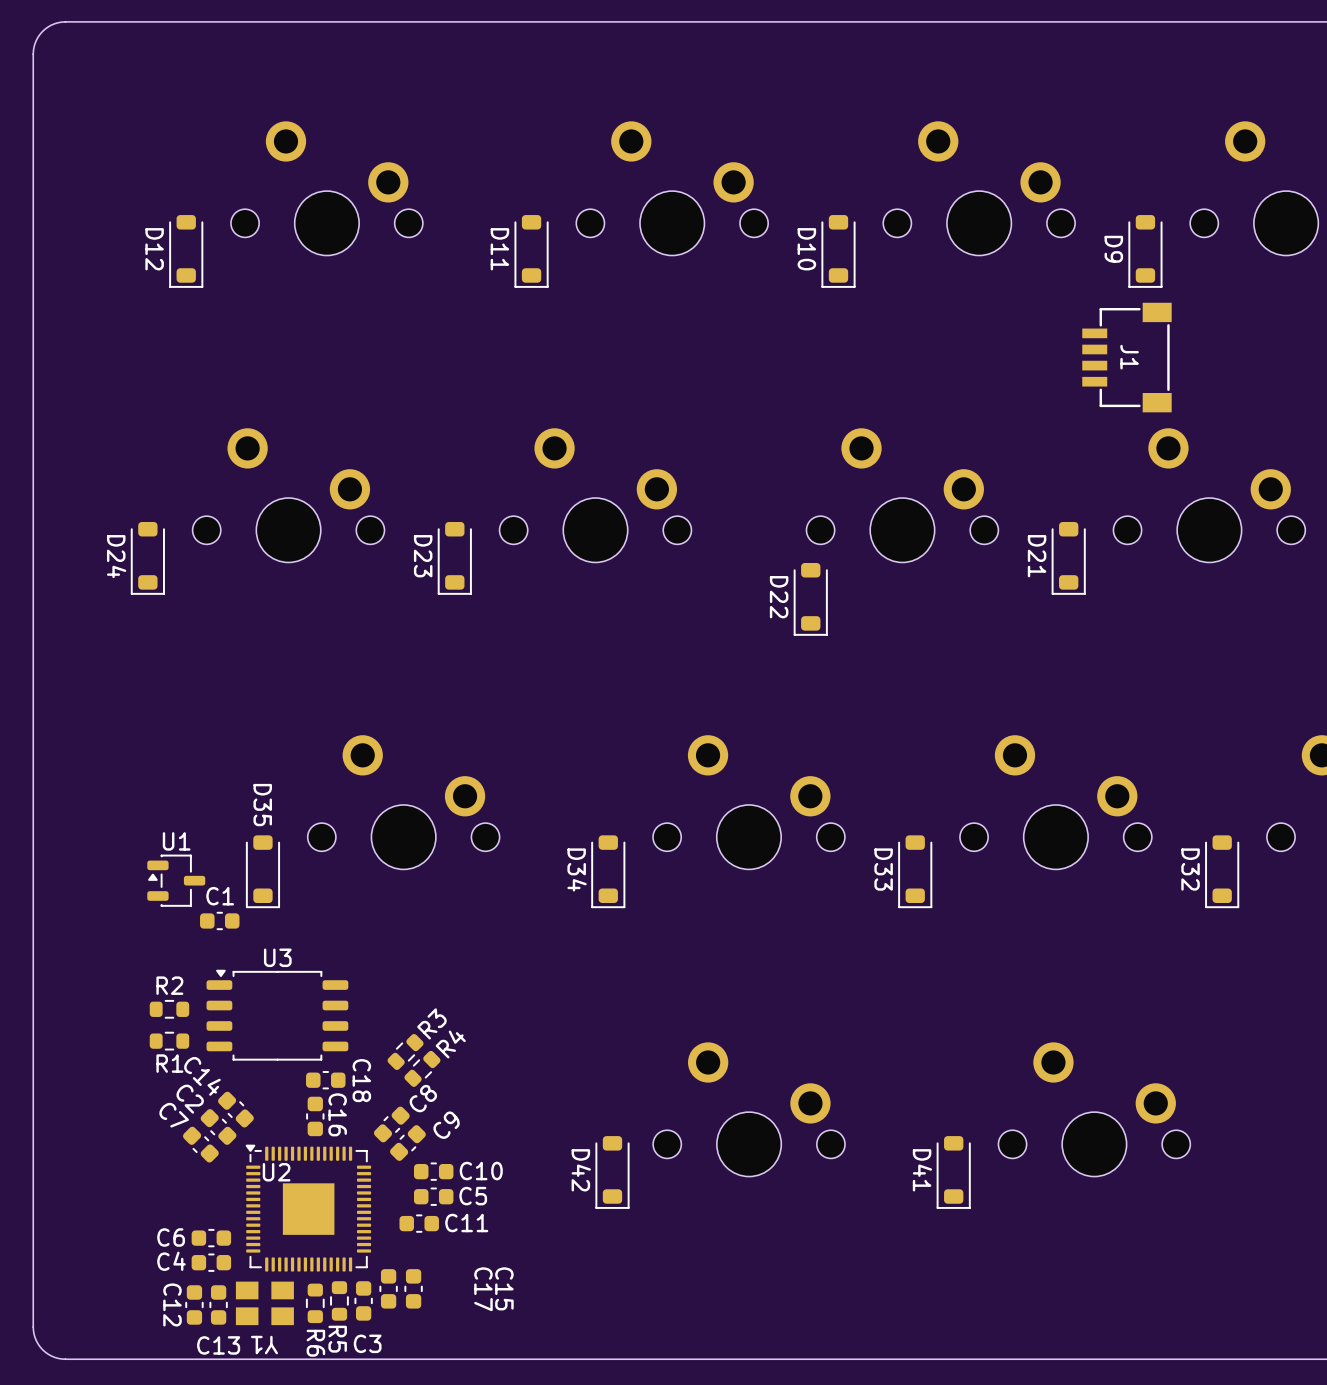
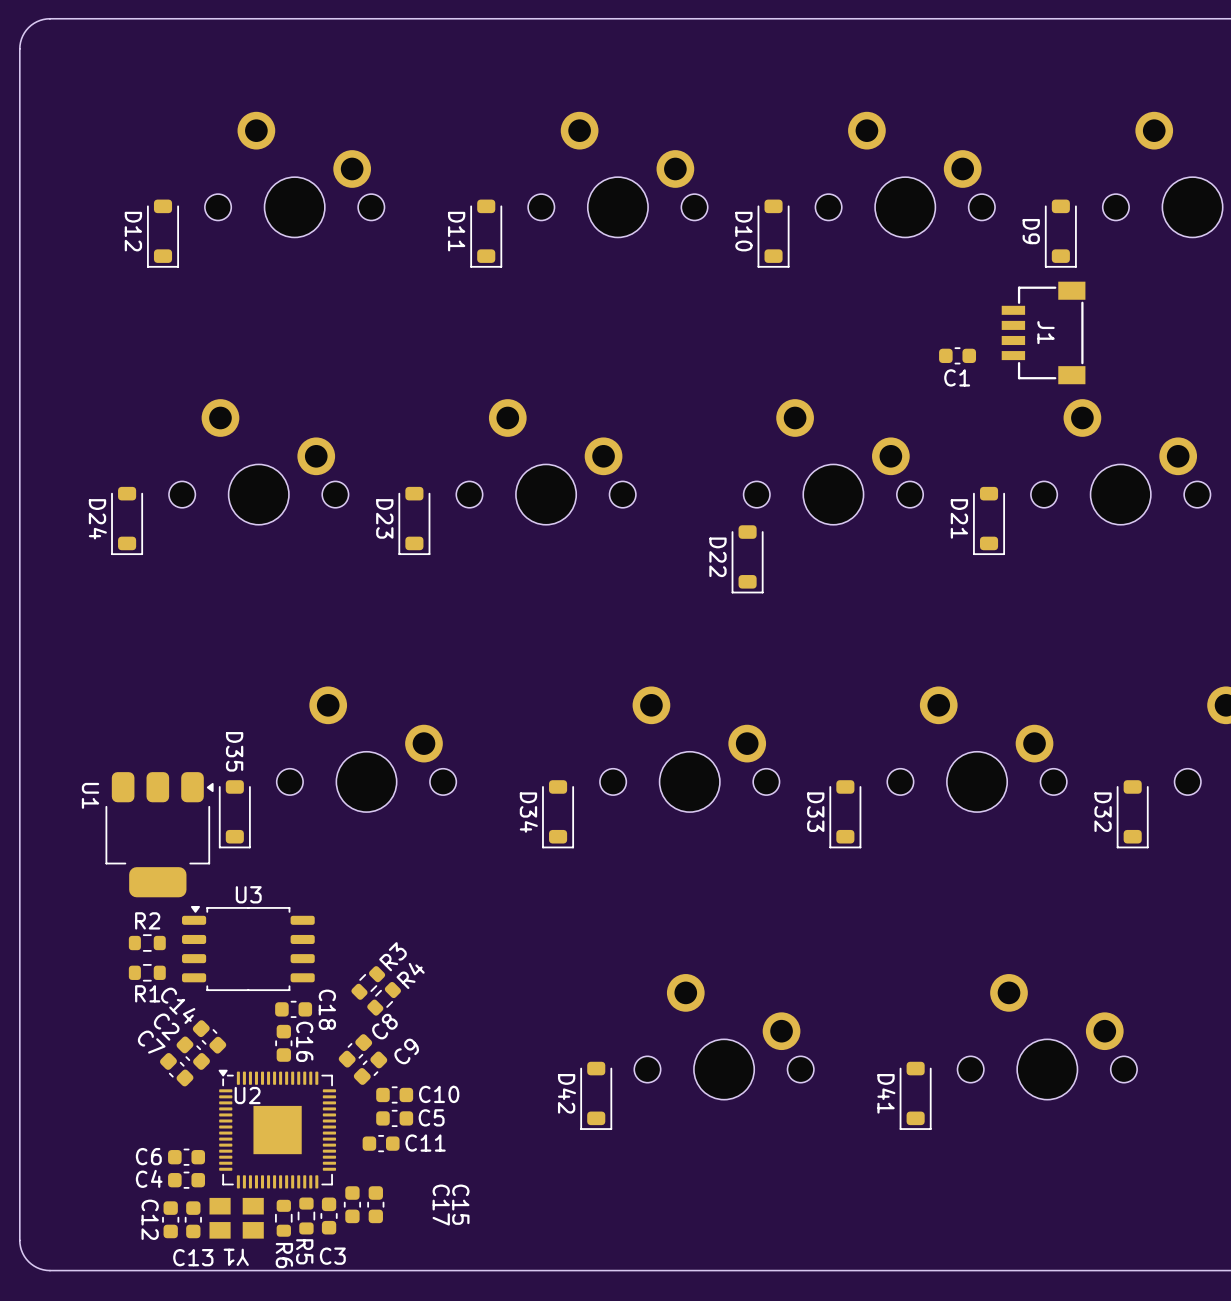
U1 name position: U1 (176, 841) -> U1 (90, 795)
U1 footprint: [147, 854, 206, 907] -> [105, 772, 214, 898]
C1 name position: C1 (220, 896) -> C1 (957, 377)
C1 position: (219, 920) -> (957, 355)
part position: (749, 1109) -> (724, 1036)
part position: (1094, 1109) -> (1047, 1036)
D42 position: (612, 1172) -> (596, 1095)
D41 position: (953, 1172) -> (915, 1095)

